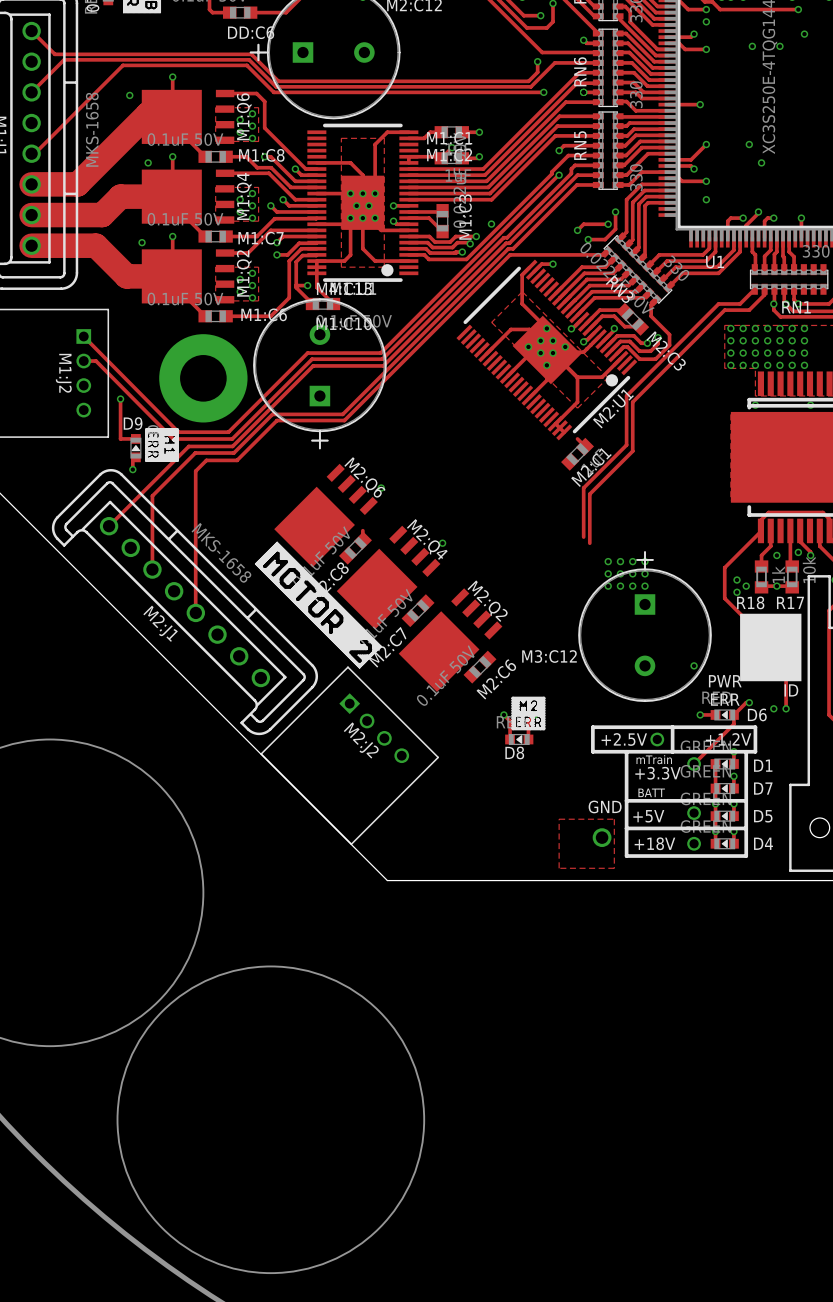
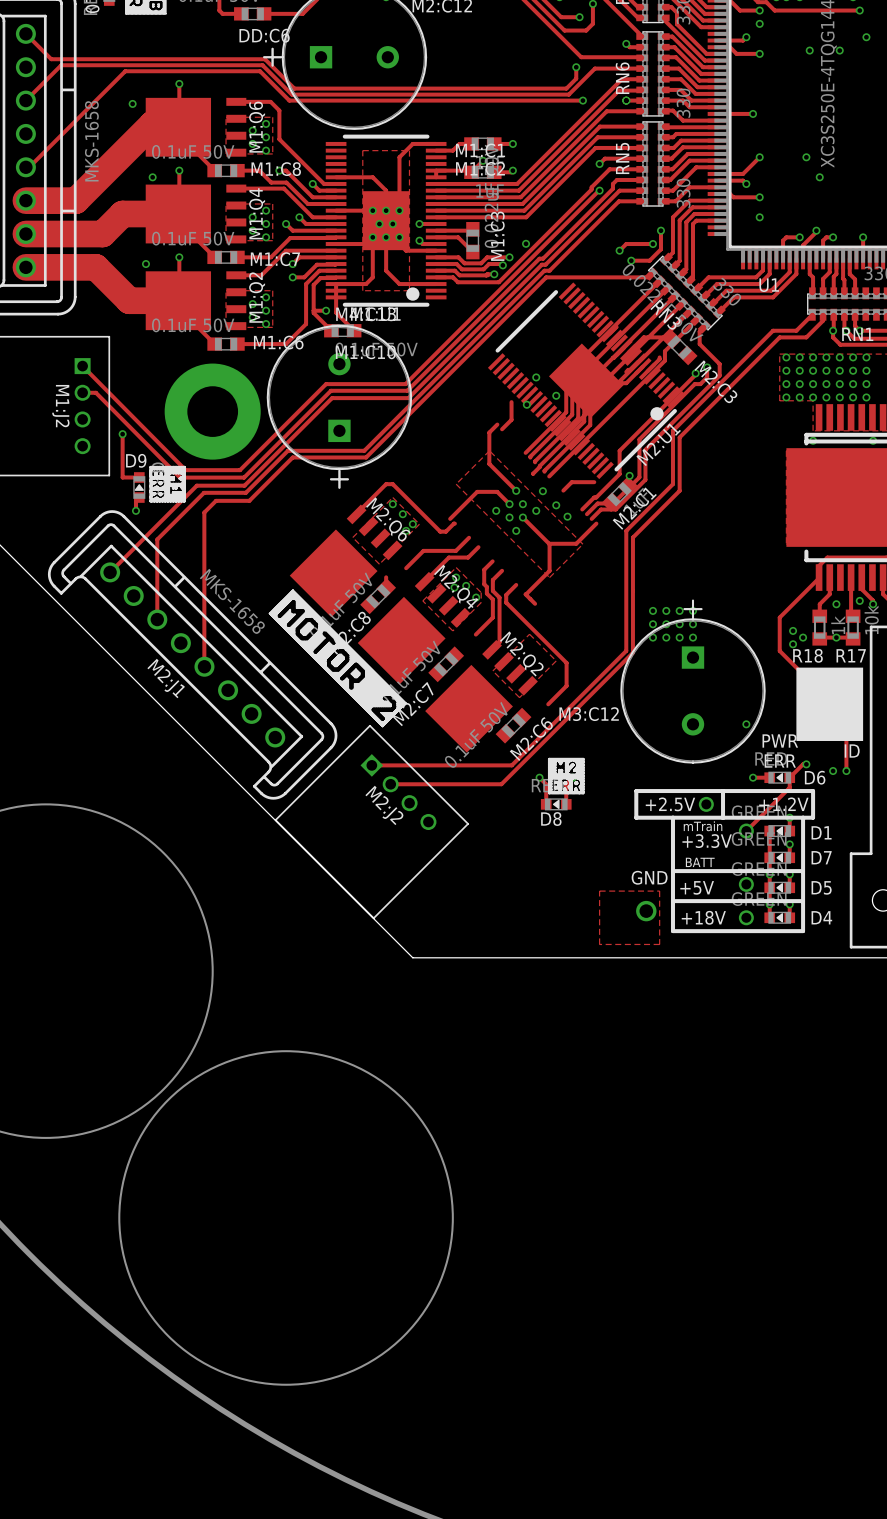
track: (553, 264) (541, 264) (533, 271) -> none
via: (553, 264) -> none
track: (529, 267) (522, 274) (522, 303) (546, 328) -> (497, 424) (489, 432) (489, 463) (516, 490)
track: (605, 267) (581, 267) (555, 293) -> (649, 290) (566, 374) (566, 377)
track: (613, 273) (584, 273) (559, 297) -> (658, 297) (572, 383) (572, 414) (530, 457)
track: (620, 279) (587, 279) (564, 302) -> (666, 304) (578, 392) (578, 418) (535, 462)
track: (628, 285) (589, 285) (574, 300) -> (675, 310) (584, 401) (584, 421) (533, 473)
zone outline: (522, 291) (608, 377) (577, 408) (491, 322) (522, 291) -> (489, 450) (582, 544) (549, 577) (456, 484) (489, 450)
track: (636, 291) (592, 291) (572, 310) -> (683, 317) (590, 410) (590, 425) (544, 471)
track: (644, 297) (594, 297) (577, 315) -> (692, 324) (664, 351) (664, 360) (549, 476)
track: (640, 326) (624, 326) (614, 316) (602, 316) (590, 328) -> none
via: (546, 328) -> none
via: (571, 328) -> none
via: (614, 328) -> none
track: (540, 340) (529, 329) (511, 329) (486, 354) -> (509, 504) (497, 491) (477, 491) (450, 518)
via: (540, 340) -> none
via: (553, 340) -> none
via: (583, 341) -> none
track: (647, 343) (641, 343) (633, 335) (617, 335) (607, 345) -> (695, 373) (619, 450) (619, 474) (582, 509)
track: (658, 343) (650, 351) (639, 351) (629, 341) (620, 341) (611, 349) -> (707, 374) (707, 377) (700, 384) (694, 384) (639, 439) (639, 477) (613, 503) (597, 503) (586, 514)
via: none -> (536, 377)
via: (528, 346) -> none
via: (565, 346) -> none
via: (540, 353) -> none
track: (553, 353) (577, 377) (577, 402) (555, 423) (564, 432) -> (522, 517) (549, 544) (549, 570) (525, 594) (535, 603)
via: (553, 353) -> none
track: (616, 354) (623, 346) (627, 346) (639, 359) (655, 359) -> (591, 518) (601, 509) (615, 509) (645, 479) (645, 449) (704, 390)
track: (528, 355) (507, 376) -> (566, 386) (566, 412) (525, 452)
track: (620, 358) (602, 377) (577, 377) -> (596, 523) (576, 543) (549, 543)
via: none -> (556, 395)
via: (546, 365) -> none
track: none -> (511, 402) (511, 419) (502, 429)
via: none -> (526, 404)
via: none -> (629, 475)
track: (577, 438) (584, 446) -> none
track: none -> (594, 482) (571, 482) (563, 490)
via: none -> (516, 490)
via: none -> (542, 491)
zone outline: none -> (392, 497) (352, 537) (379, 564) (419, 524) (392, 497)
via: none -> (392, 504)
via: none -> (509, 504)
via: none -> (522, 504)
via: none -> (556, 505)
via: none -> (496, 510)
via: none -> (536, 510)
track: none -> (356, 514) (386, 484) (392, 484) (440, 531) (445, 531) (454, 523)
via: none -> (402, 514)
via: none -> (567, 516)
via: none -> (509, 517)
via: none -> (522, 517)
via: none -> (412, 524)
via: none -> (516, 530)
track: none -> (469, 537) (455, 550) (423, 550) (406, 568)
track: none -> (478, 547) (468, 557) (448, 557) (424, 581)
track: none -> (492, 561) (484, 569) (484, 584) (486, 586) (486, 593) (492, 599) (492, 617) (475, 634)
zone outline: none -> (456, 567) (422, 600) (452, 630) (481, 602) (481, 592) (456, 567)
track: none -> (502, 570) (492, 579) (492, 590) (499, 597) (499, 642) (492, 649)
via: none -> (456, 577)
track: none -> (516, 584) (506, 594) (506, 602) (566, 662) (566, 685) (548, 704)
track: none -> (626, 584) (626, 650) (511, 765) (371, 765)
via: none -> (466, 585)
via: none -> (454, 587)
via: (442, 543) -> none
track: none -> (632, 590) (632, 652) (501, 784) (390, 784)
via: none -> (476, 597)
zone outline: none -> (529, 634) (556, 660) (519, 697) (492, 670) (529, 634)

